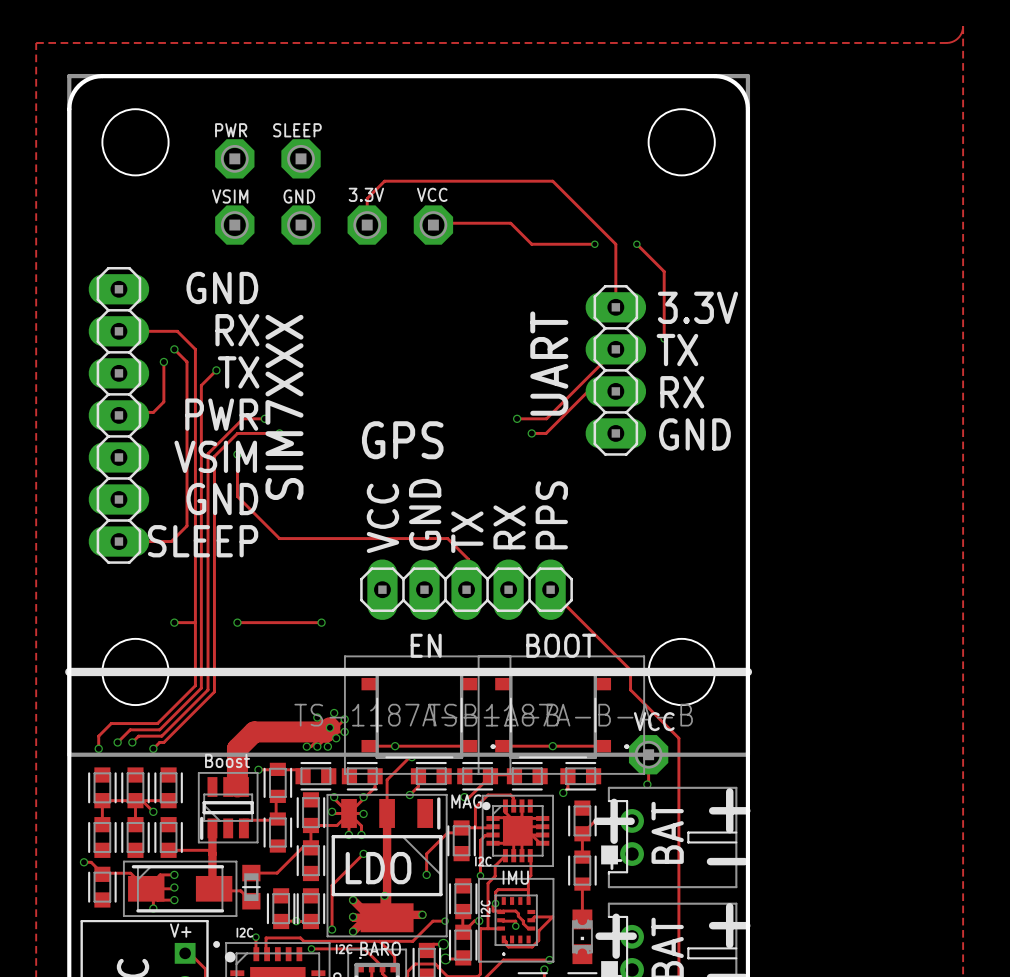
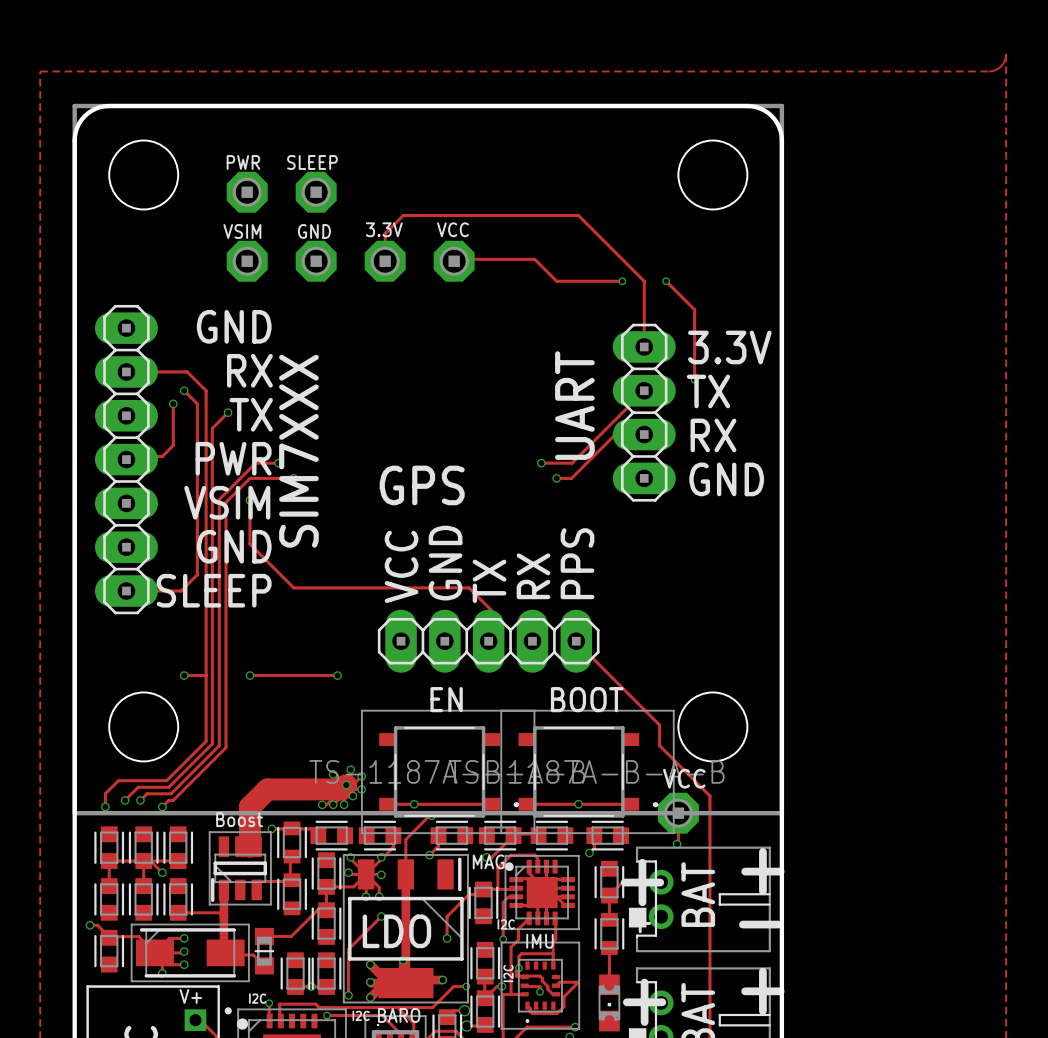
line: (69, 671) (747, 671) -> none

